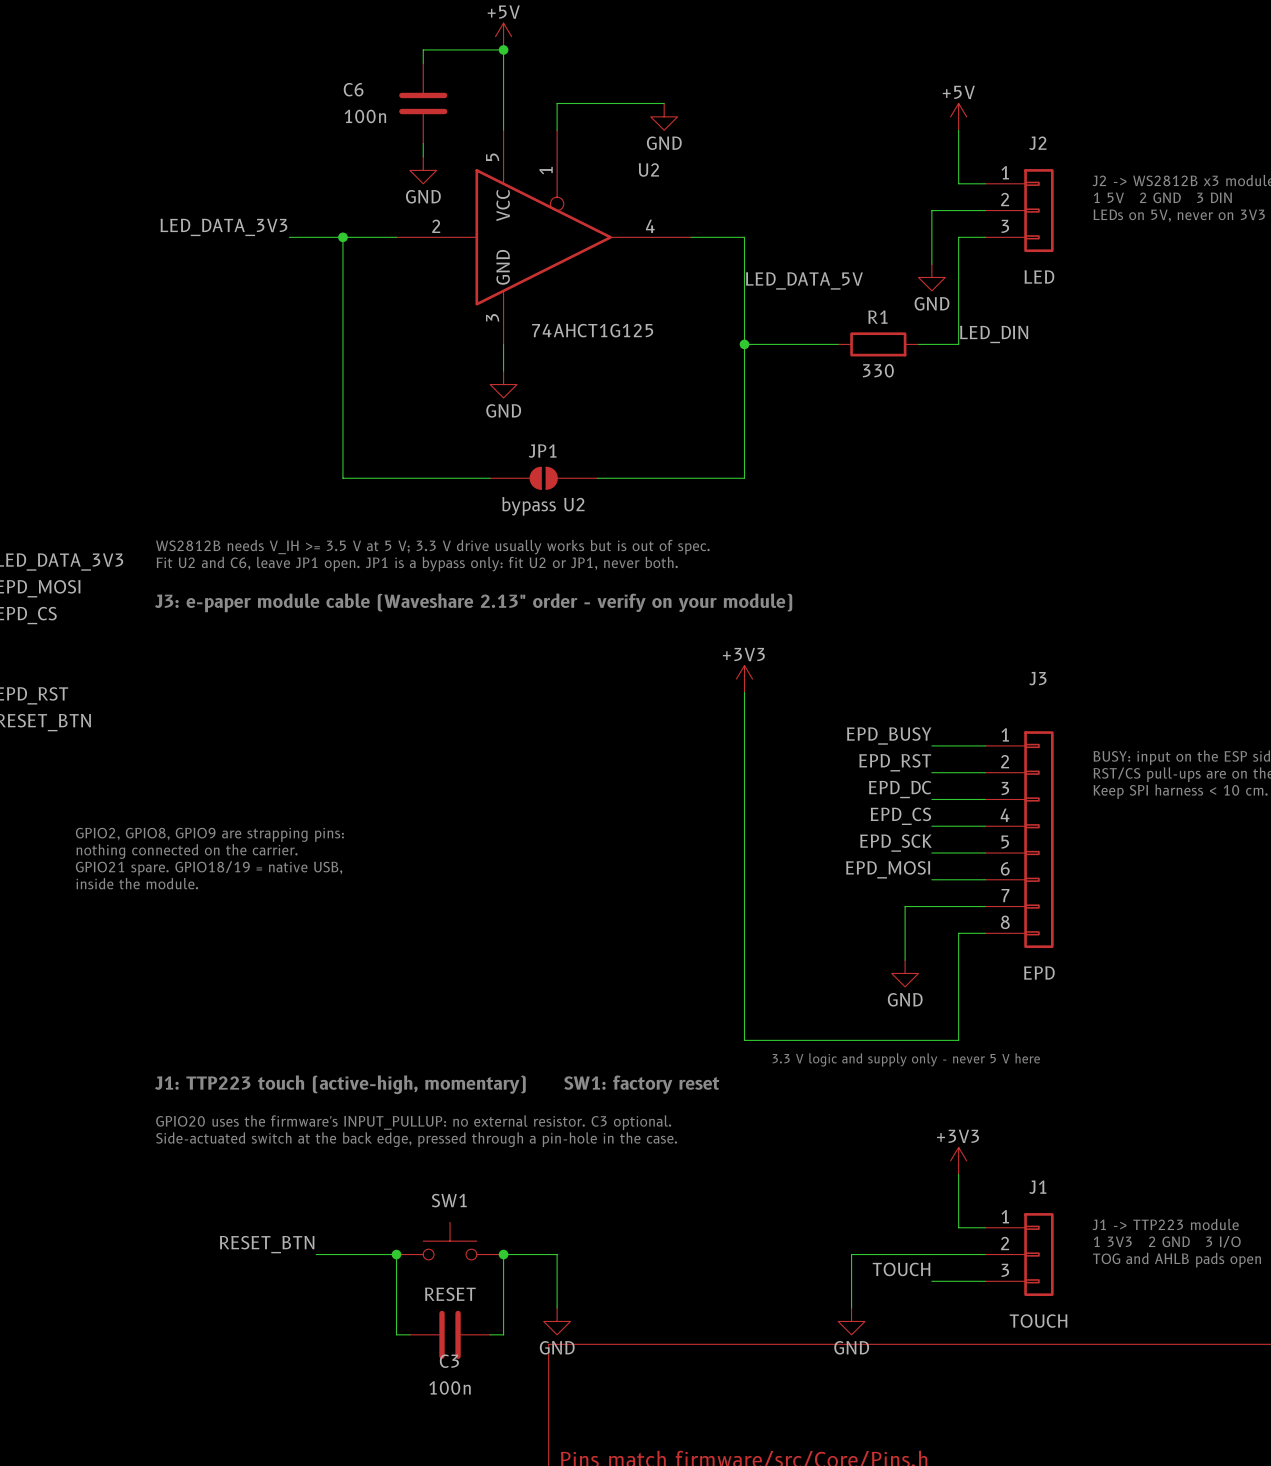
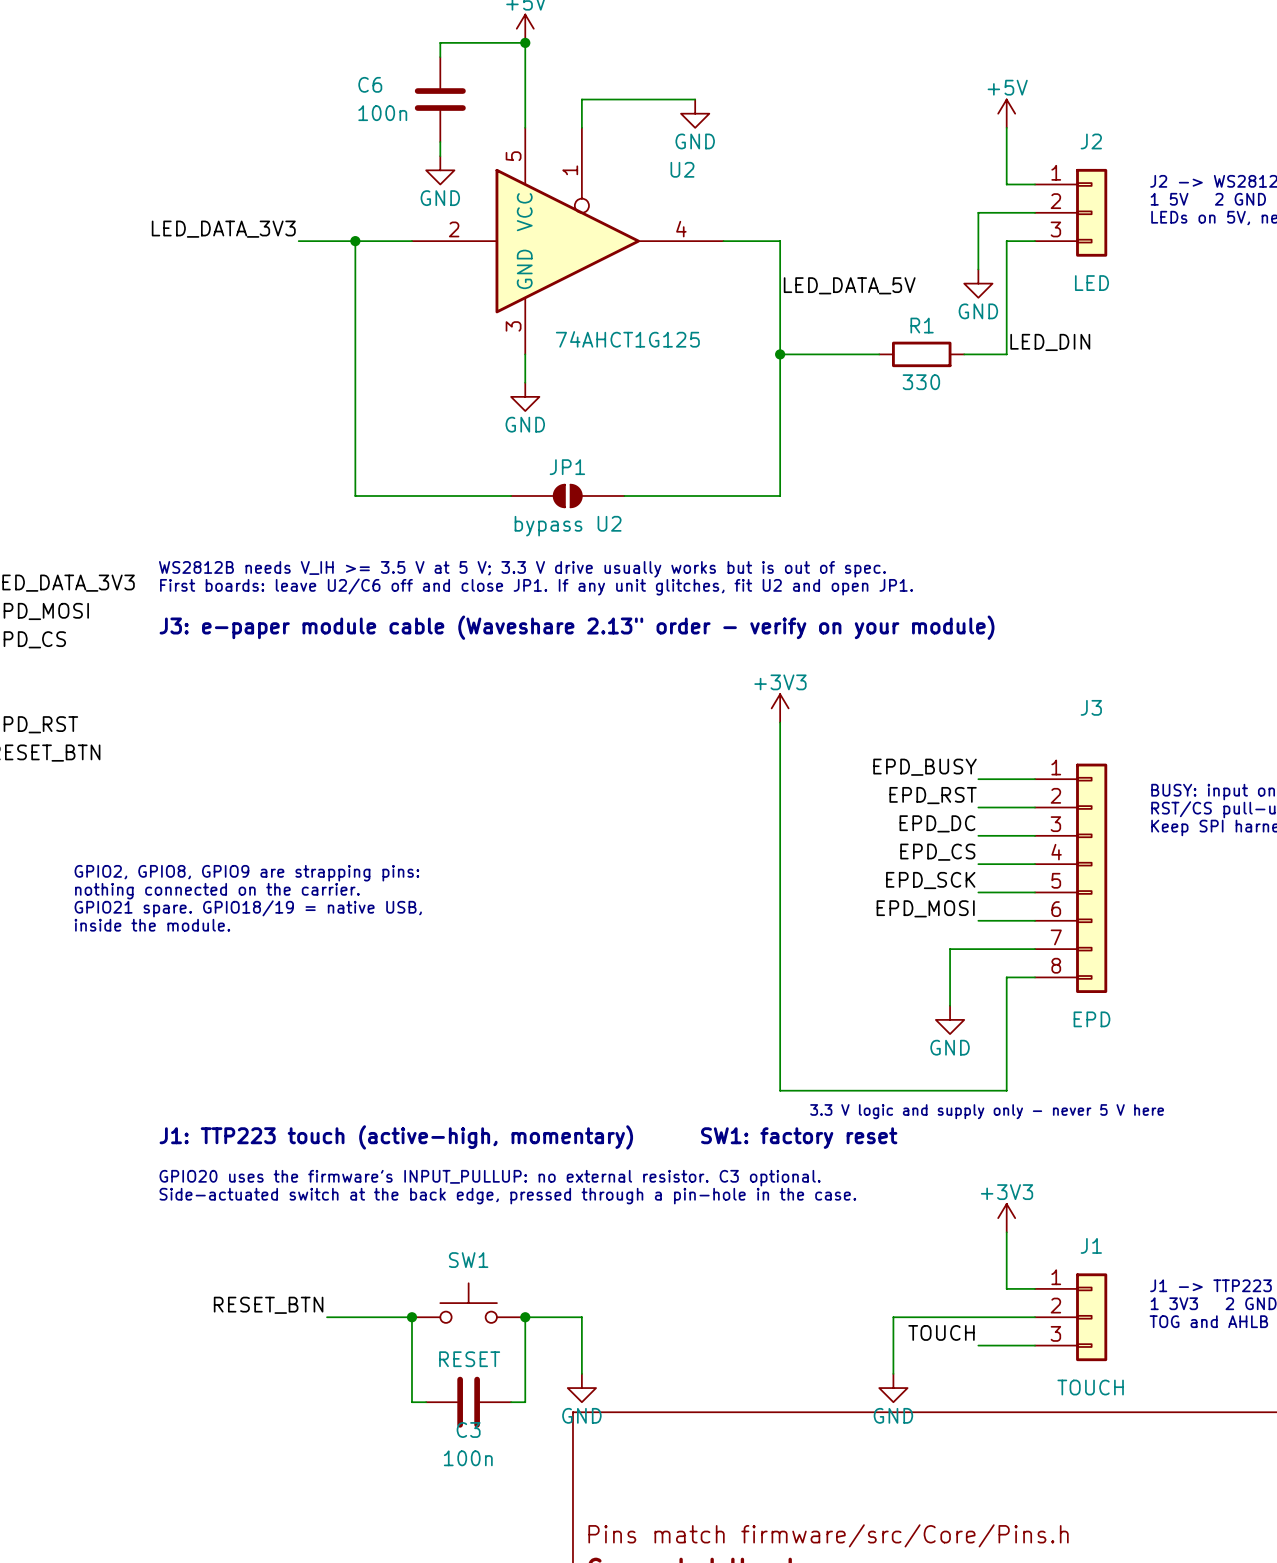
text: Fit U2 and C6, leave JP1 open. JP1 is a bypass only: fit U2 or JP1, never both. (417, 564) -> First boards: leave U2/C6 off and close JP1. If any unit glitches, fit U2 and open JP1. (536, 586)

